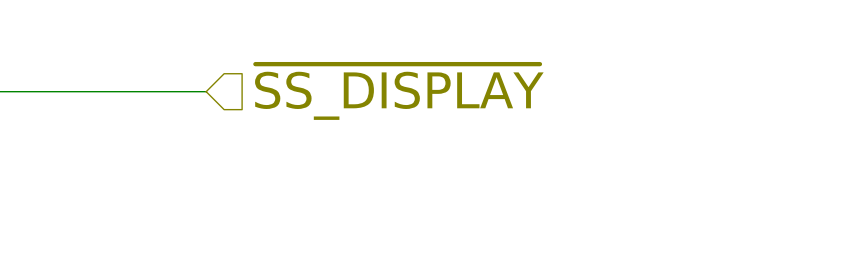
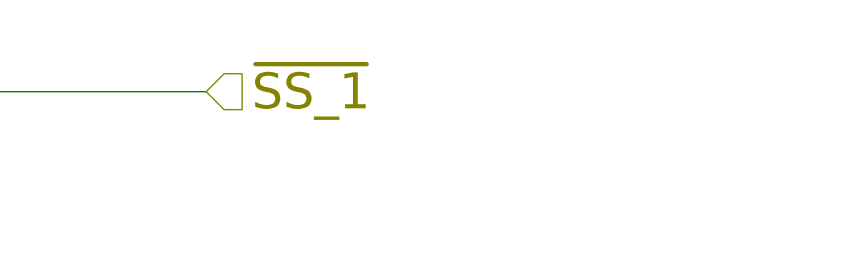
hierarchical label: ~{SS_DISPLAY} (399, 92) -> ~{SS_1} (310, 92)

